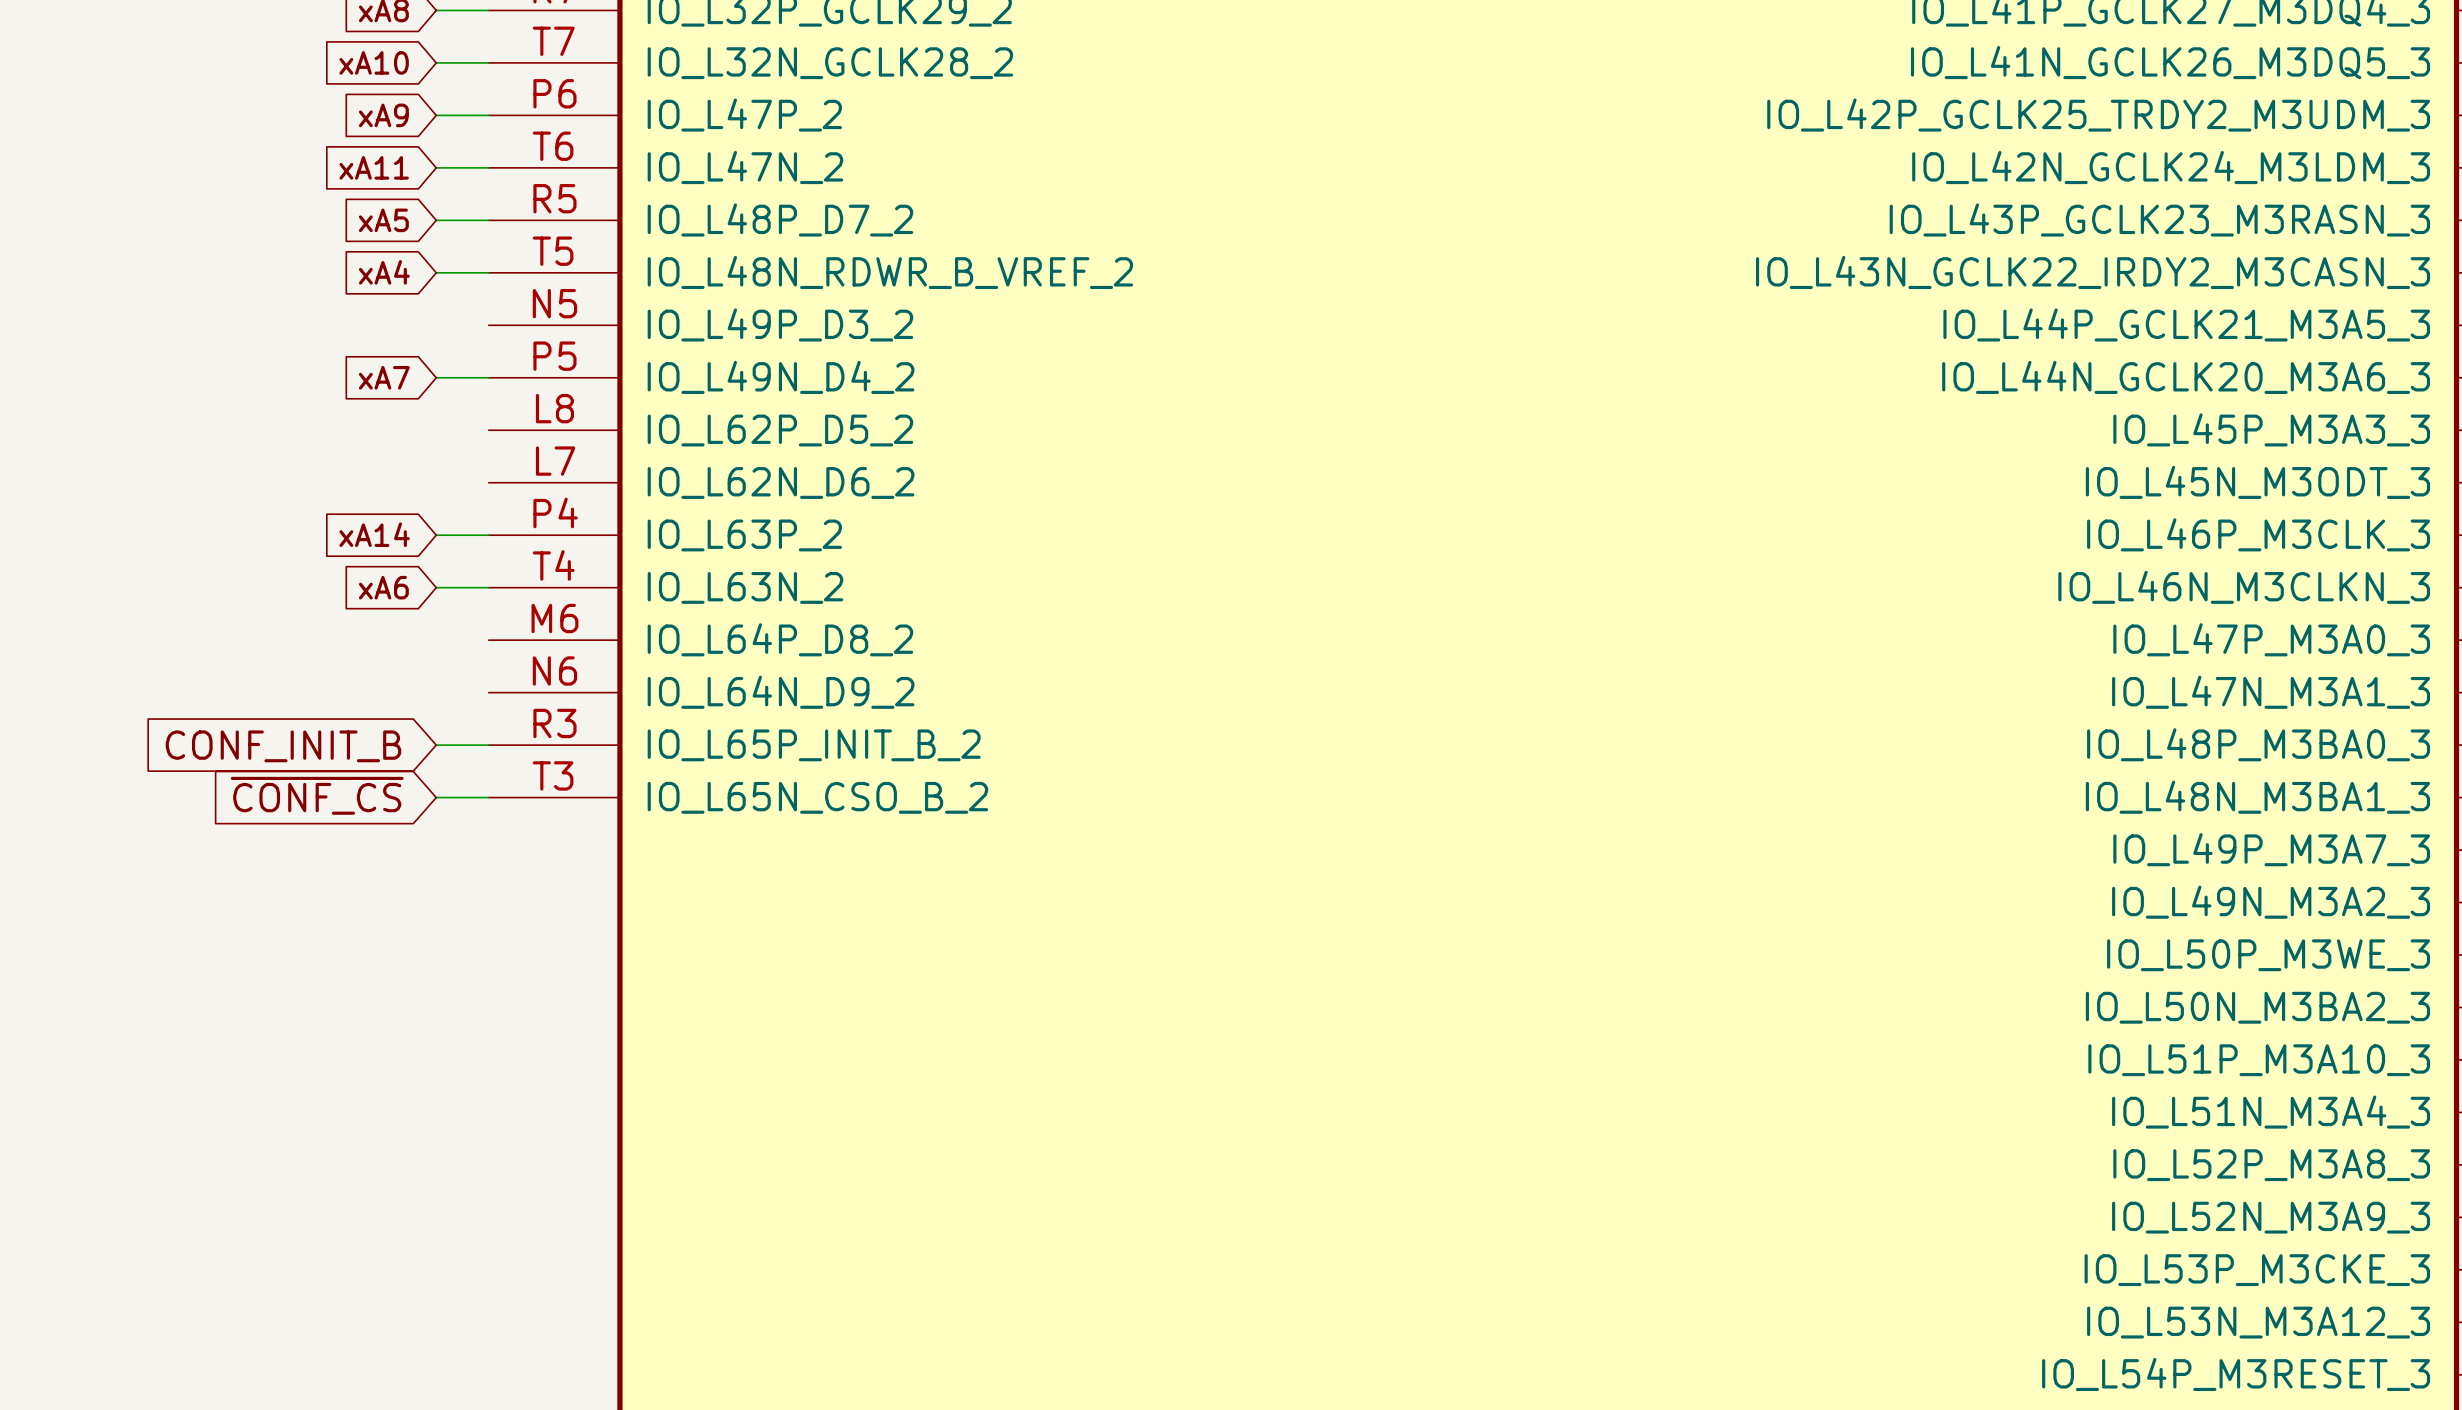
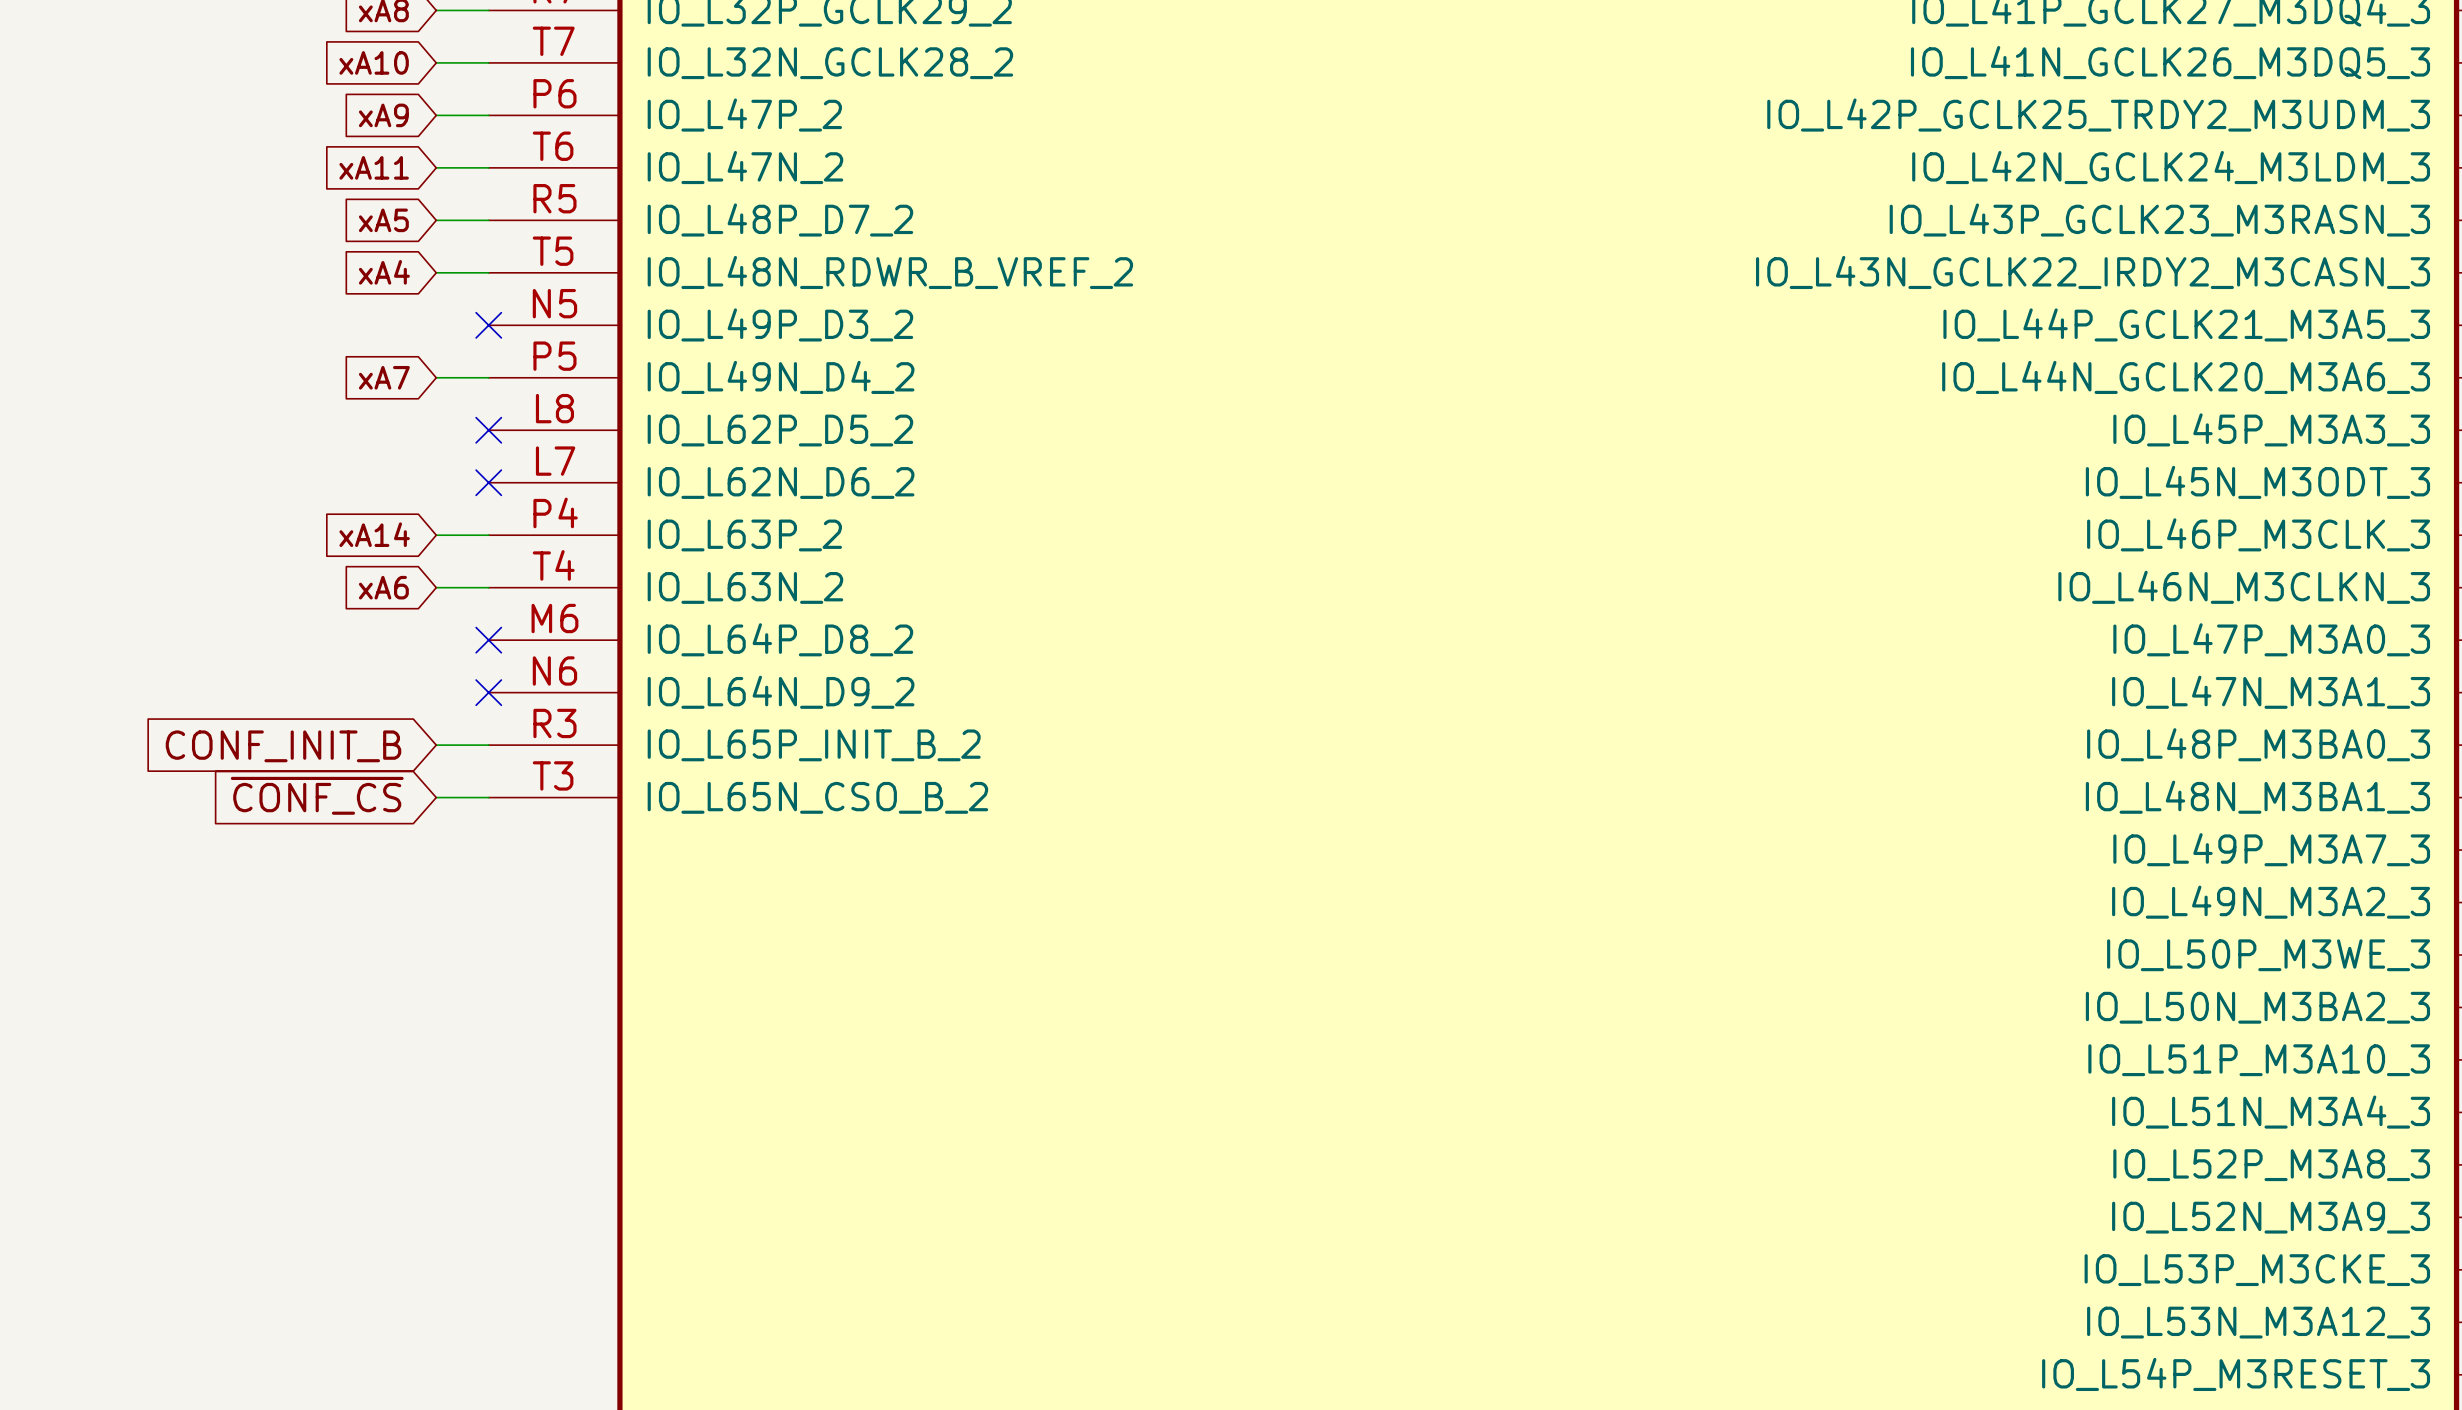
no-connect mark: none -> (488, 325)
no-connect mark: none -> (488, 430)
no-connect mark: none -> (488, 482)
no-connect mark: none -> (488, 640)
no-connect mark: none -> (488, 692)

